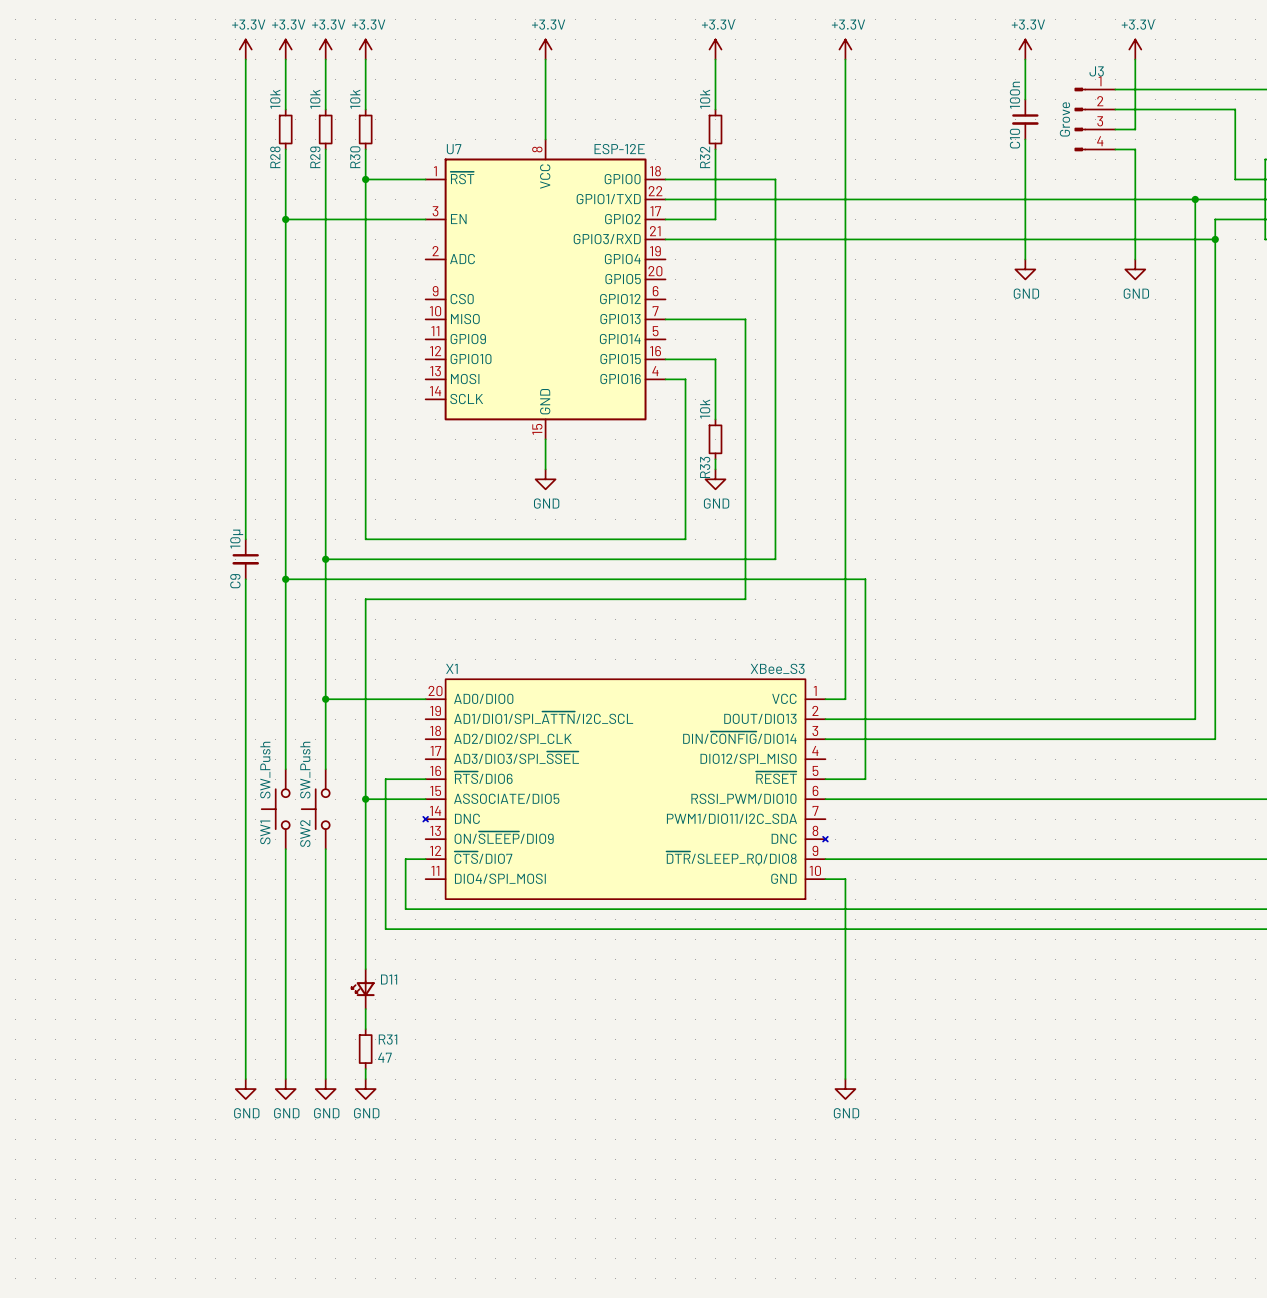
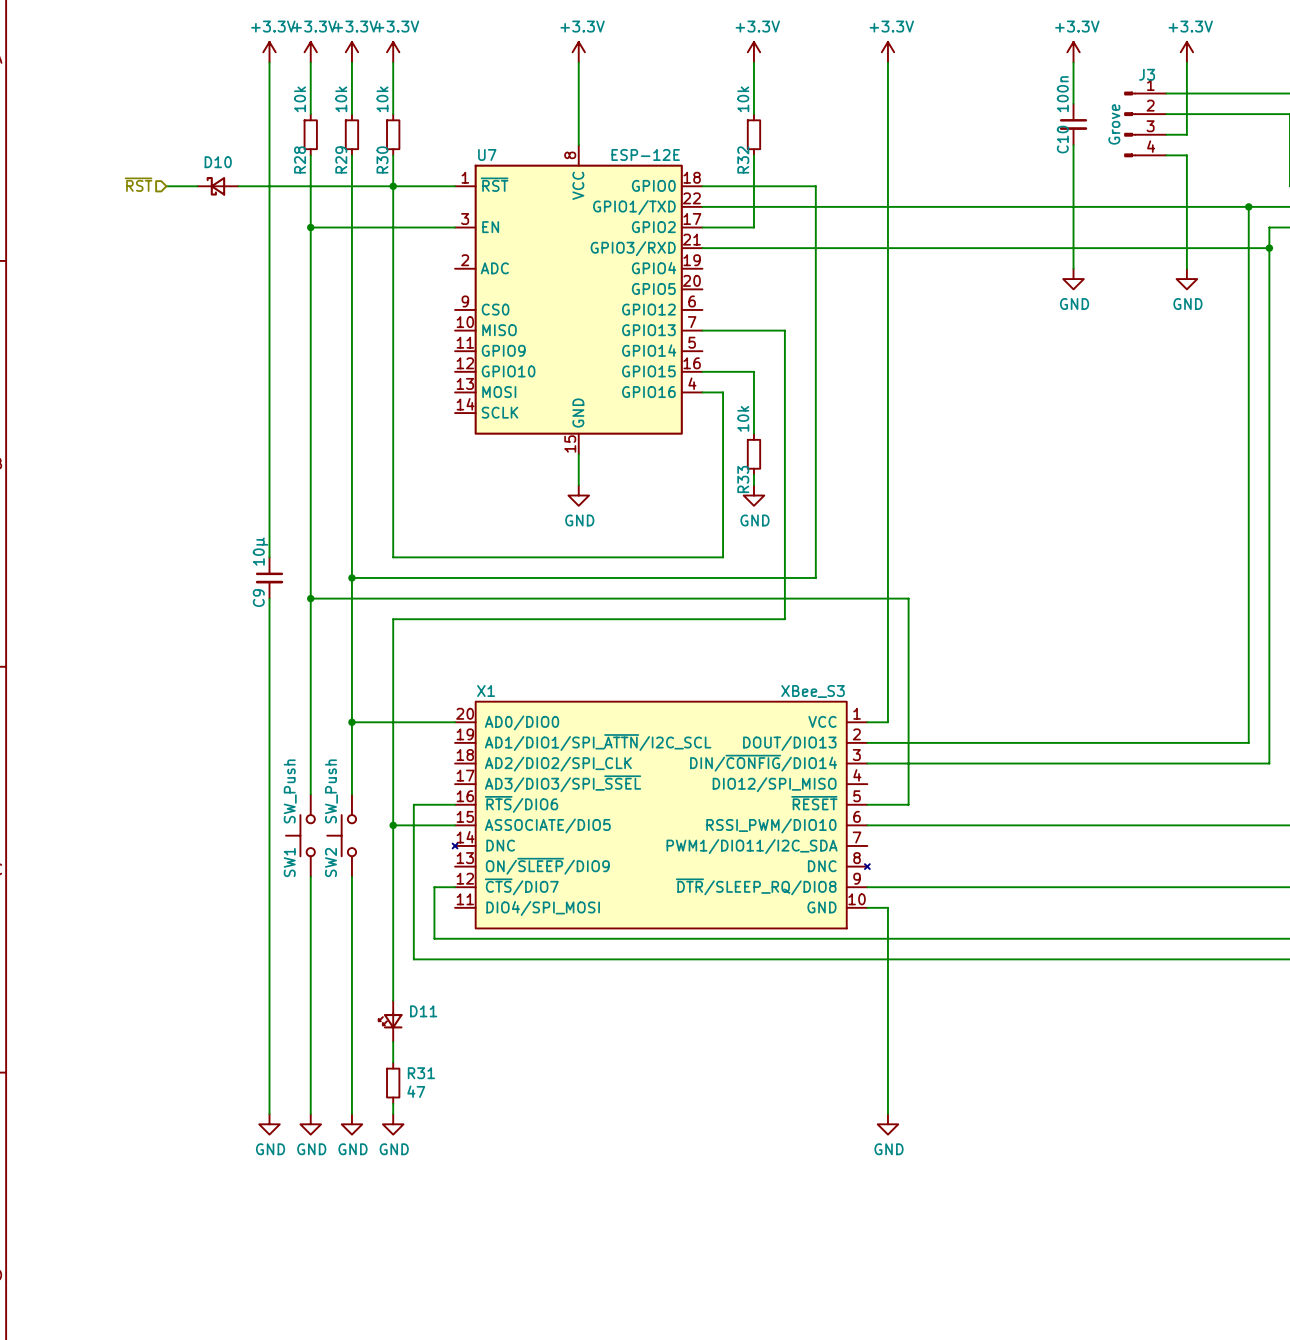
hierarchical label: none -> ~{RST} (138, 184)
wire: none -> (166, 186) (197, 186)
D10: none -> (217, 186)
wire: none -> (238, 186) (393, 186)

